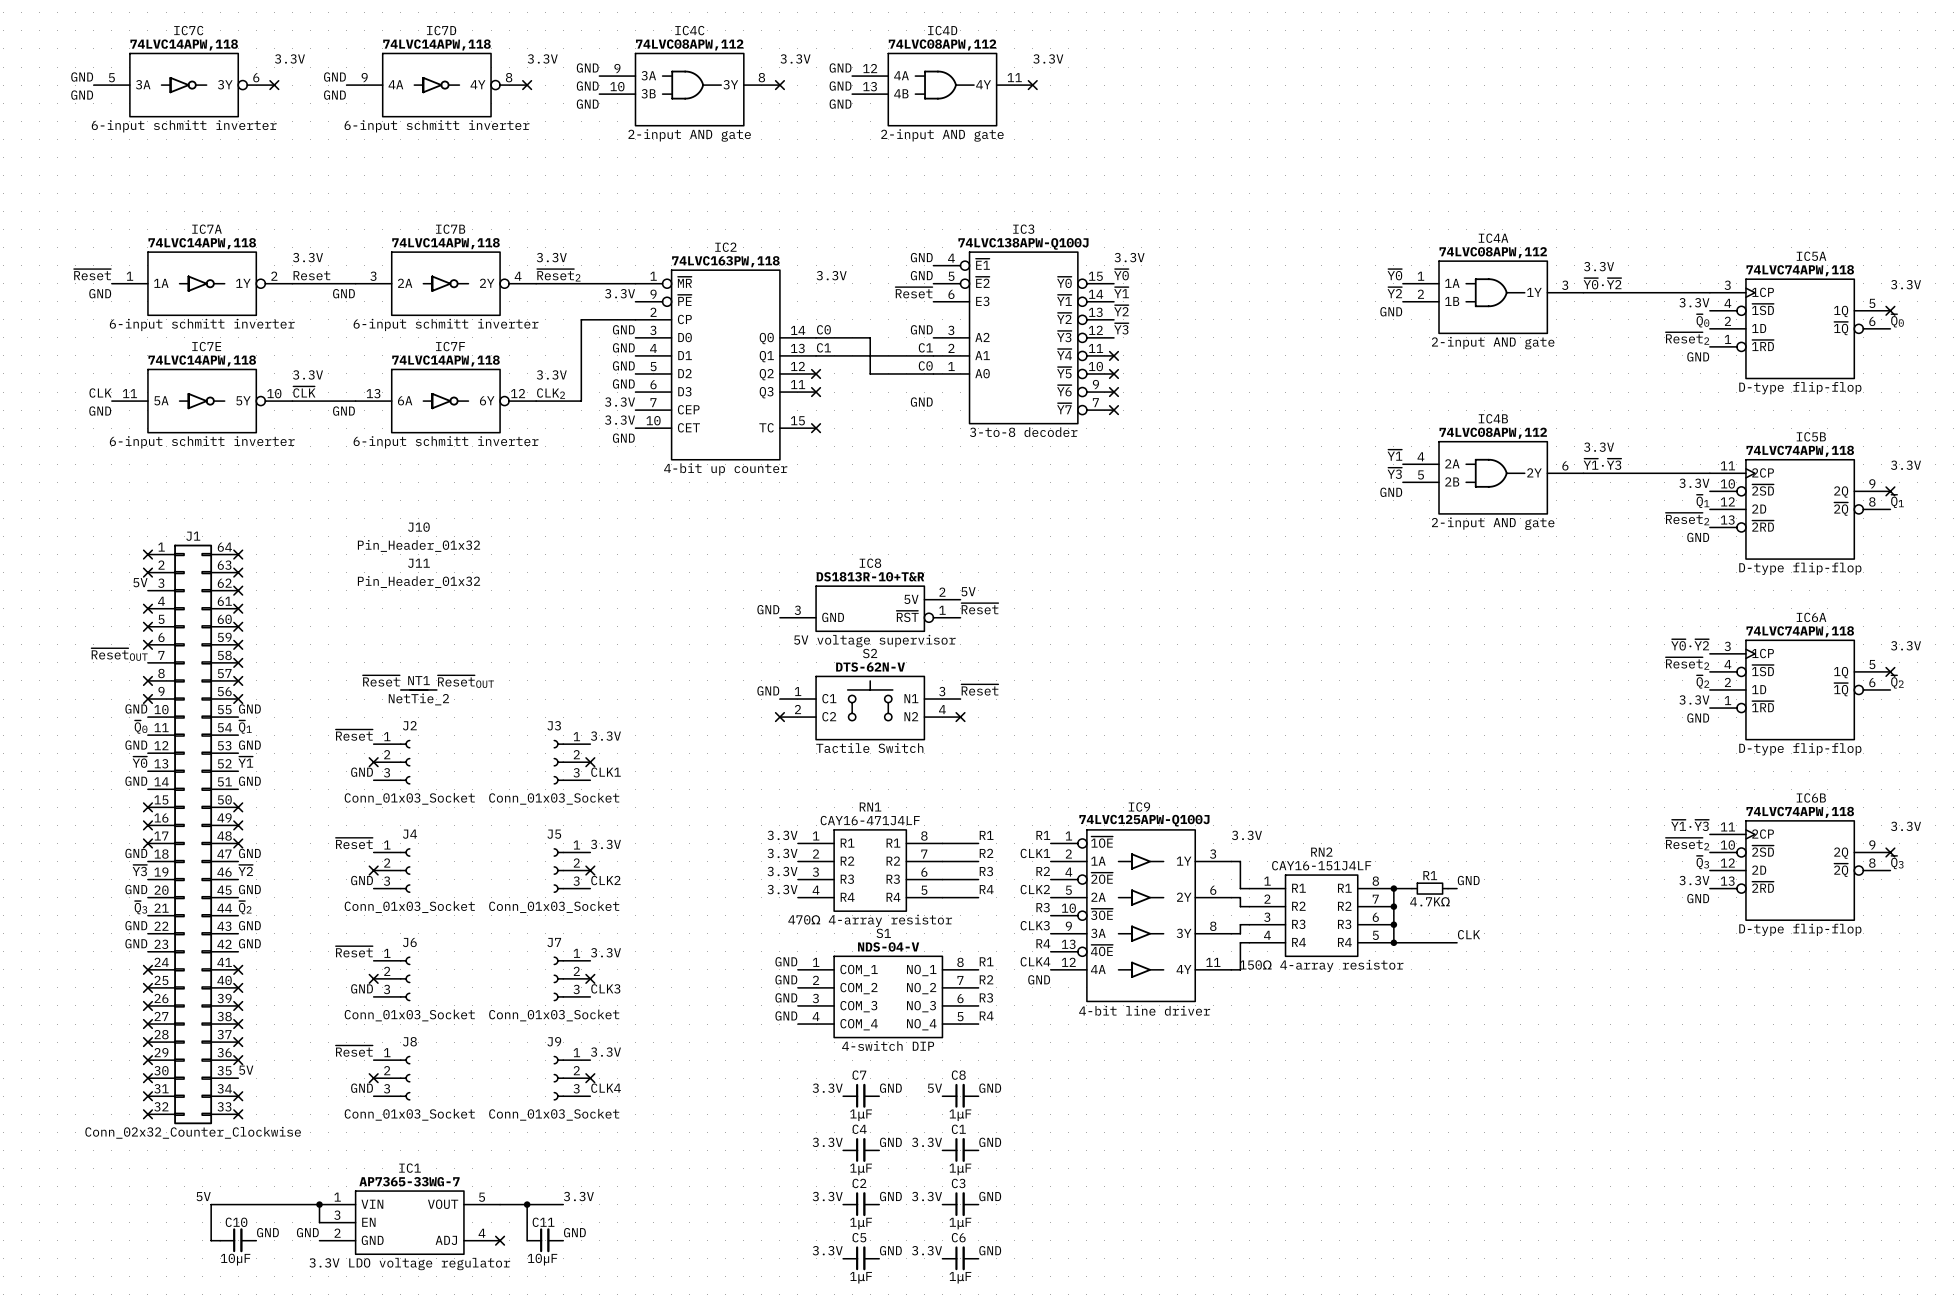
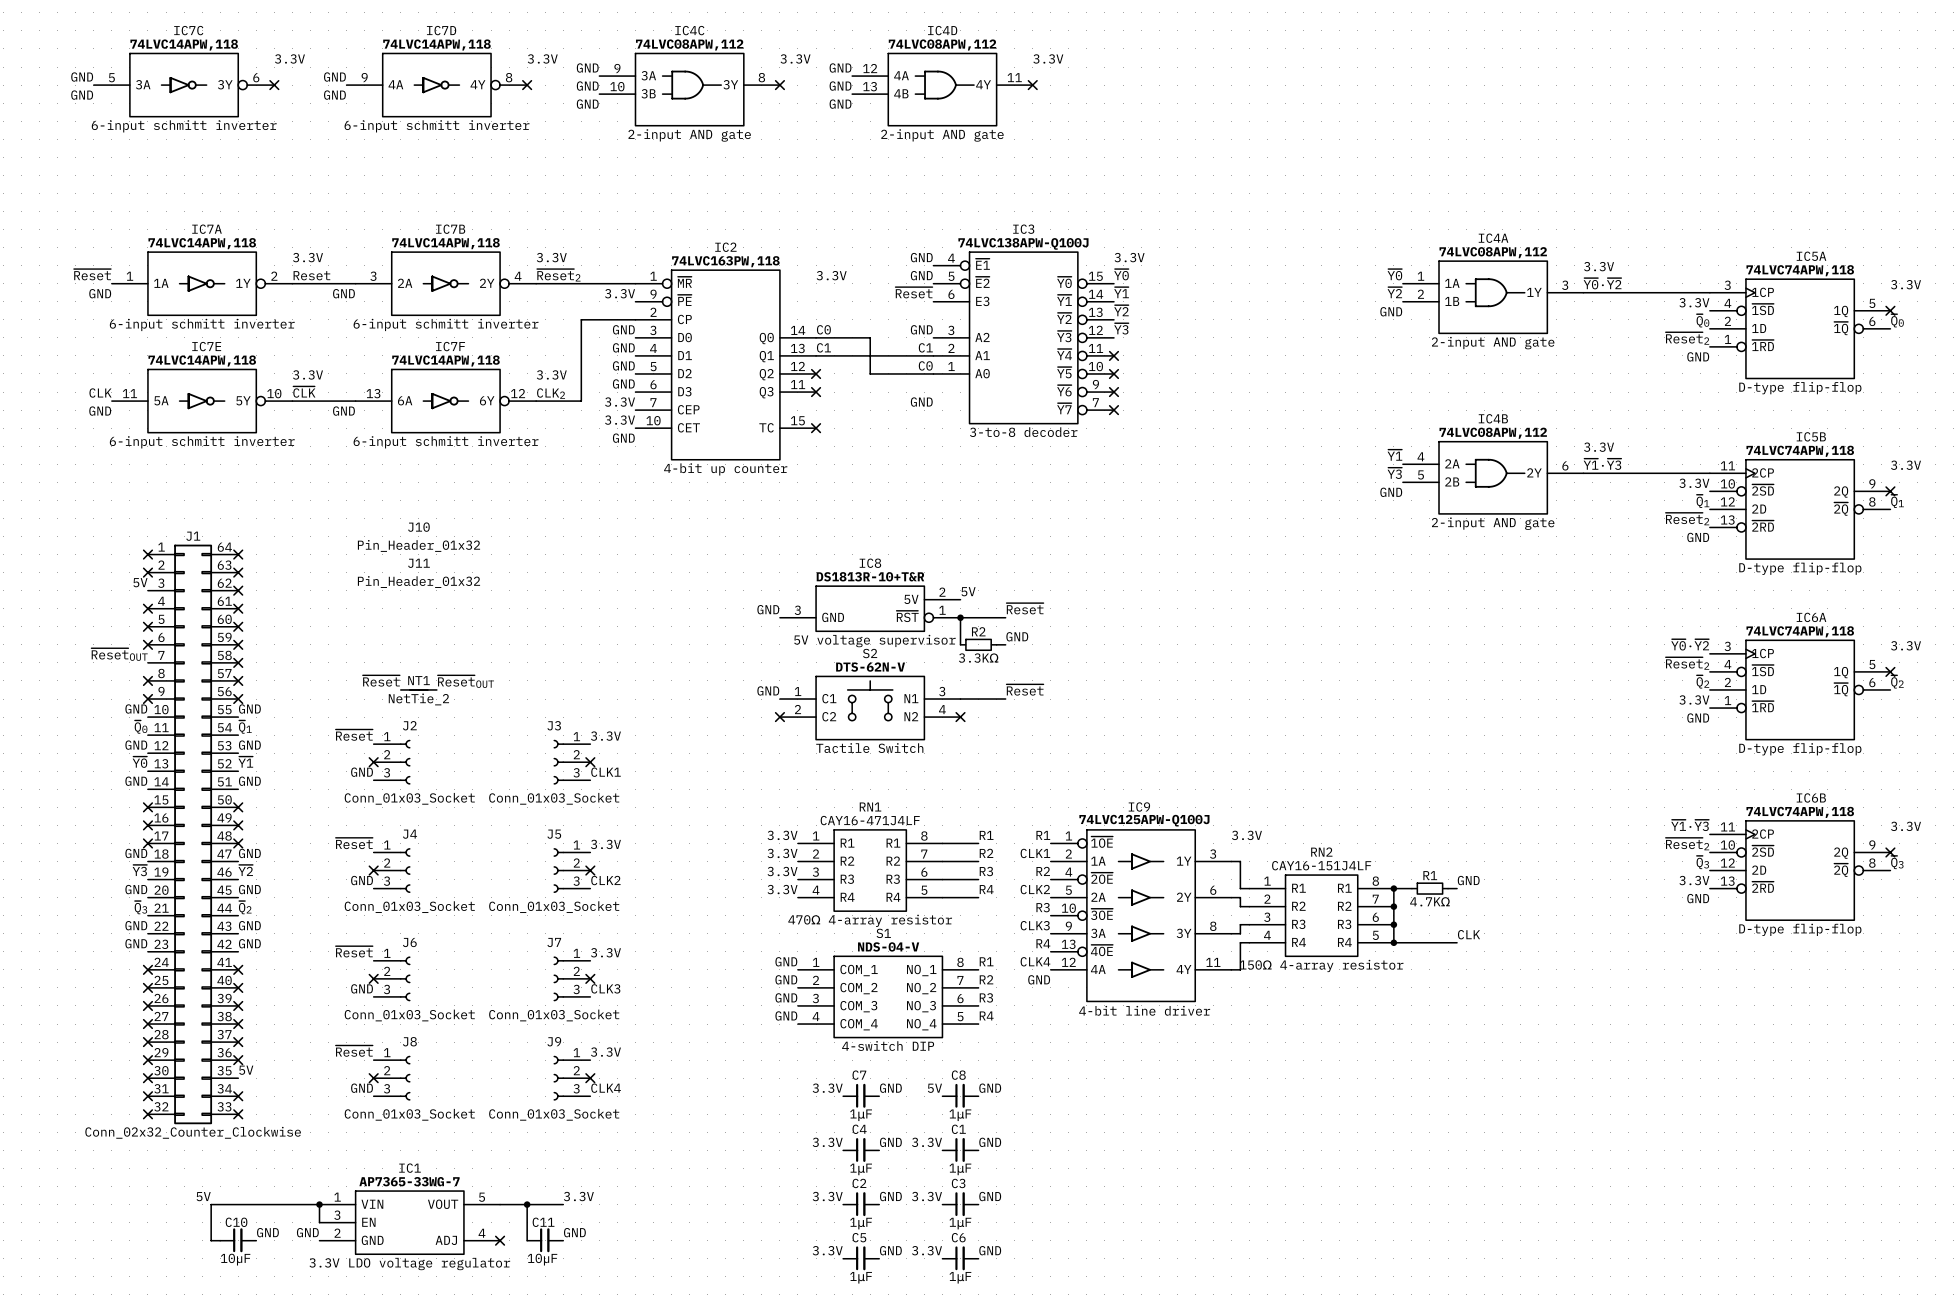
label position: ~{Reset} (979, 608) -> ~{Reset} (1025, 608)
junction: none -> (960, 617)
wire: none -> (1005, 617) (960, 617) (960, 644)
label: none -> GND (1017, 636)
R2: none -> 3.3KΩ (978, 644)
wire: none -> (996, 644) (1005, 644)
label position: ~{Reset} (979, 689) -> ~{Reset} (1025, 689)
wire: none -> (960, 699) (1005, 699)

